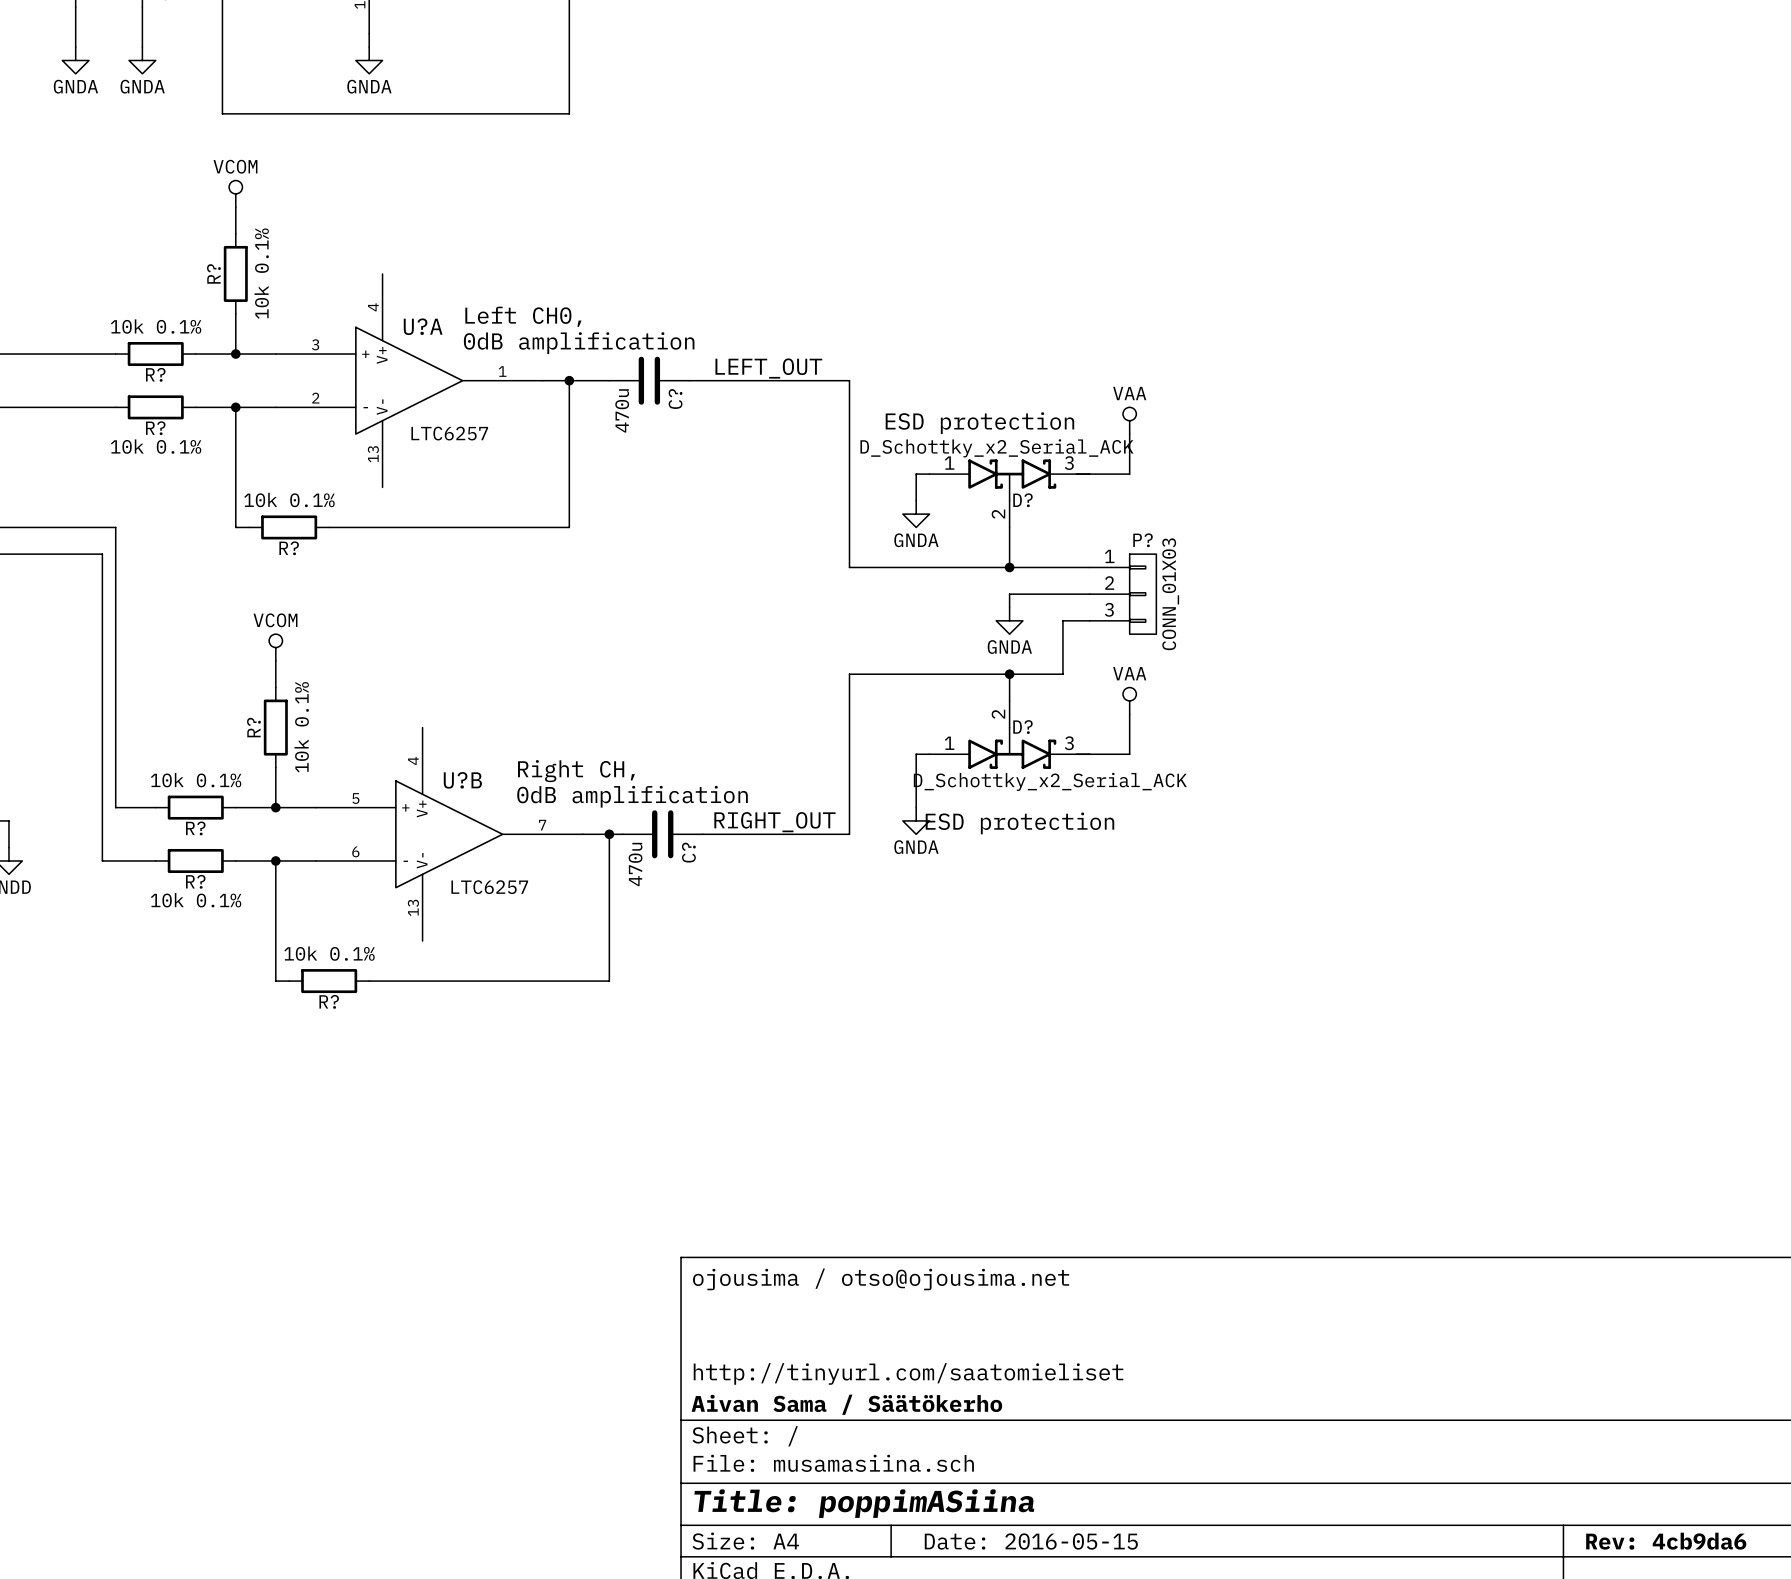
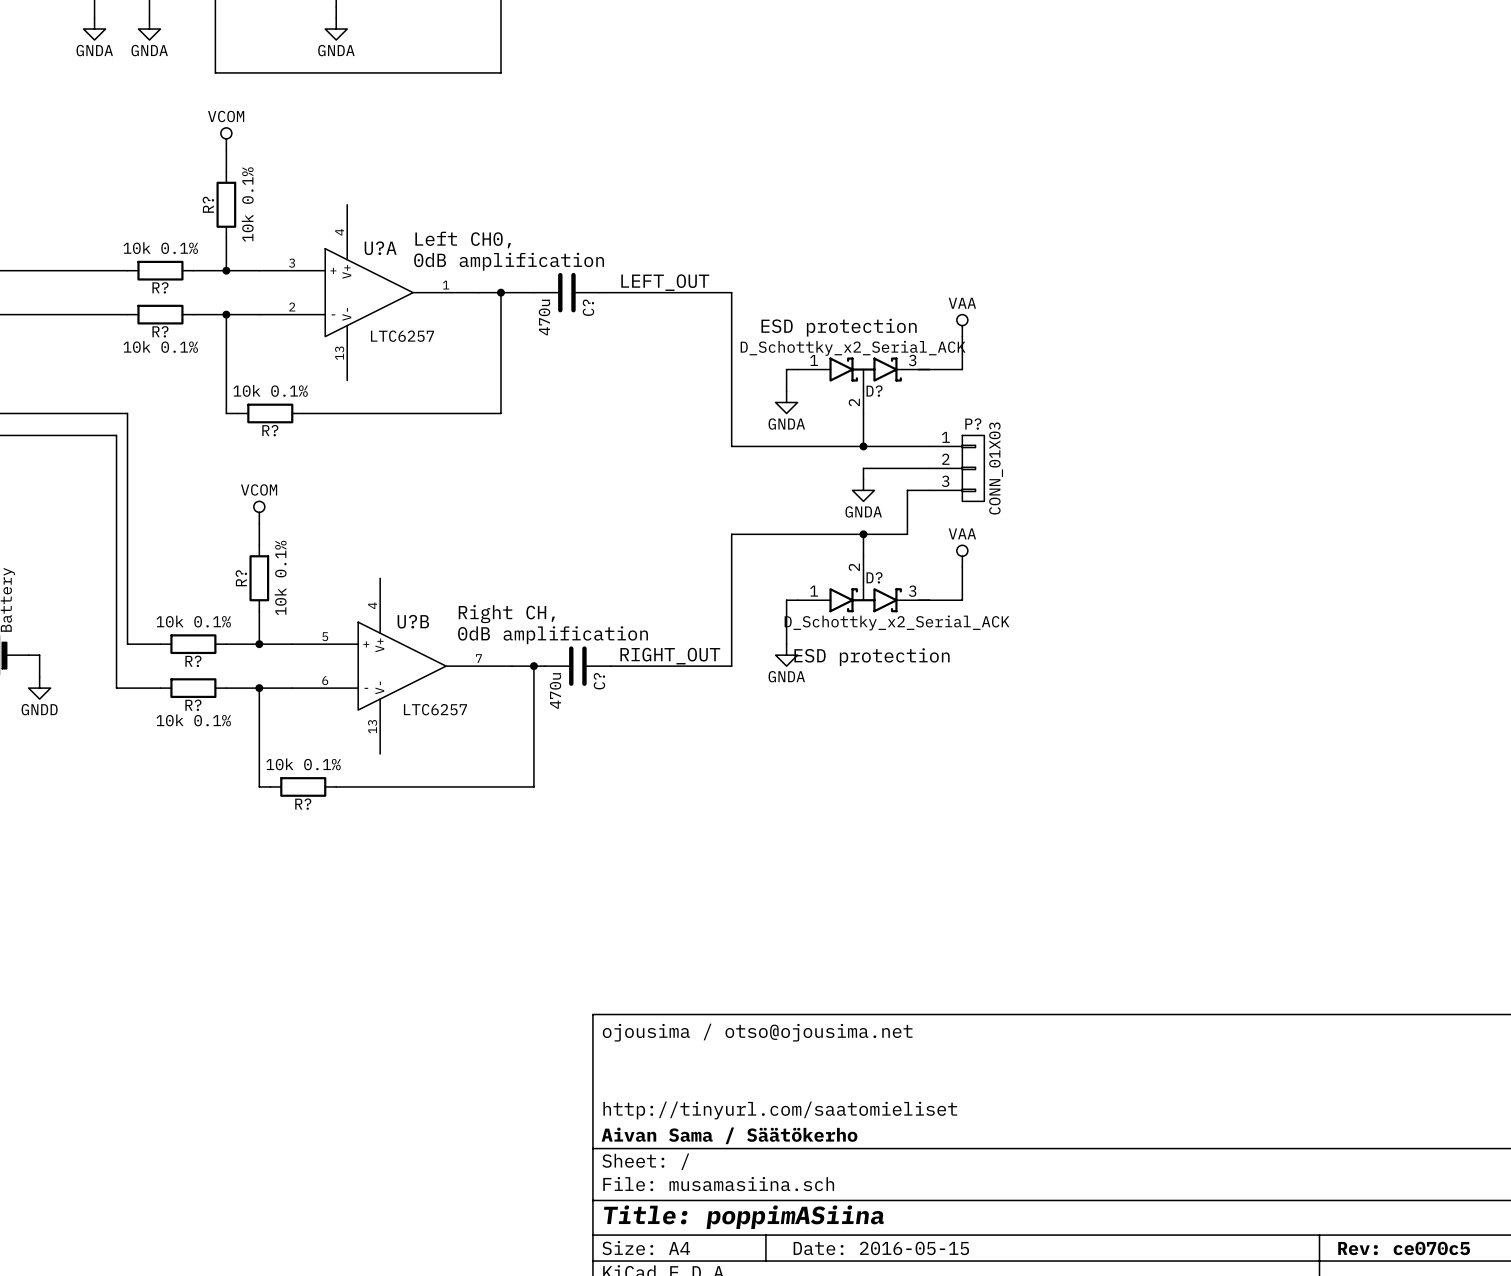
title block: Rev: 4cb9da6 (1666, 1541) -> Rev: ce070c5 (1404, 1248)

